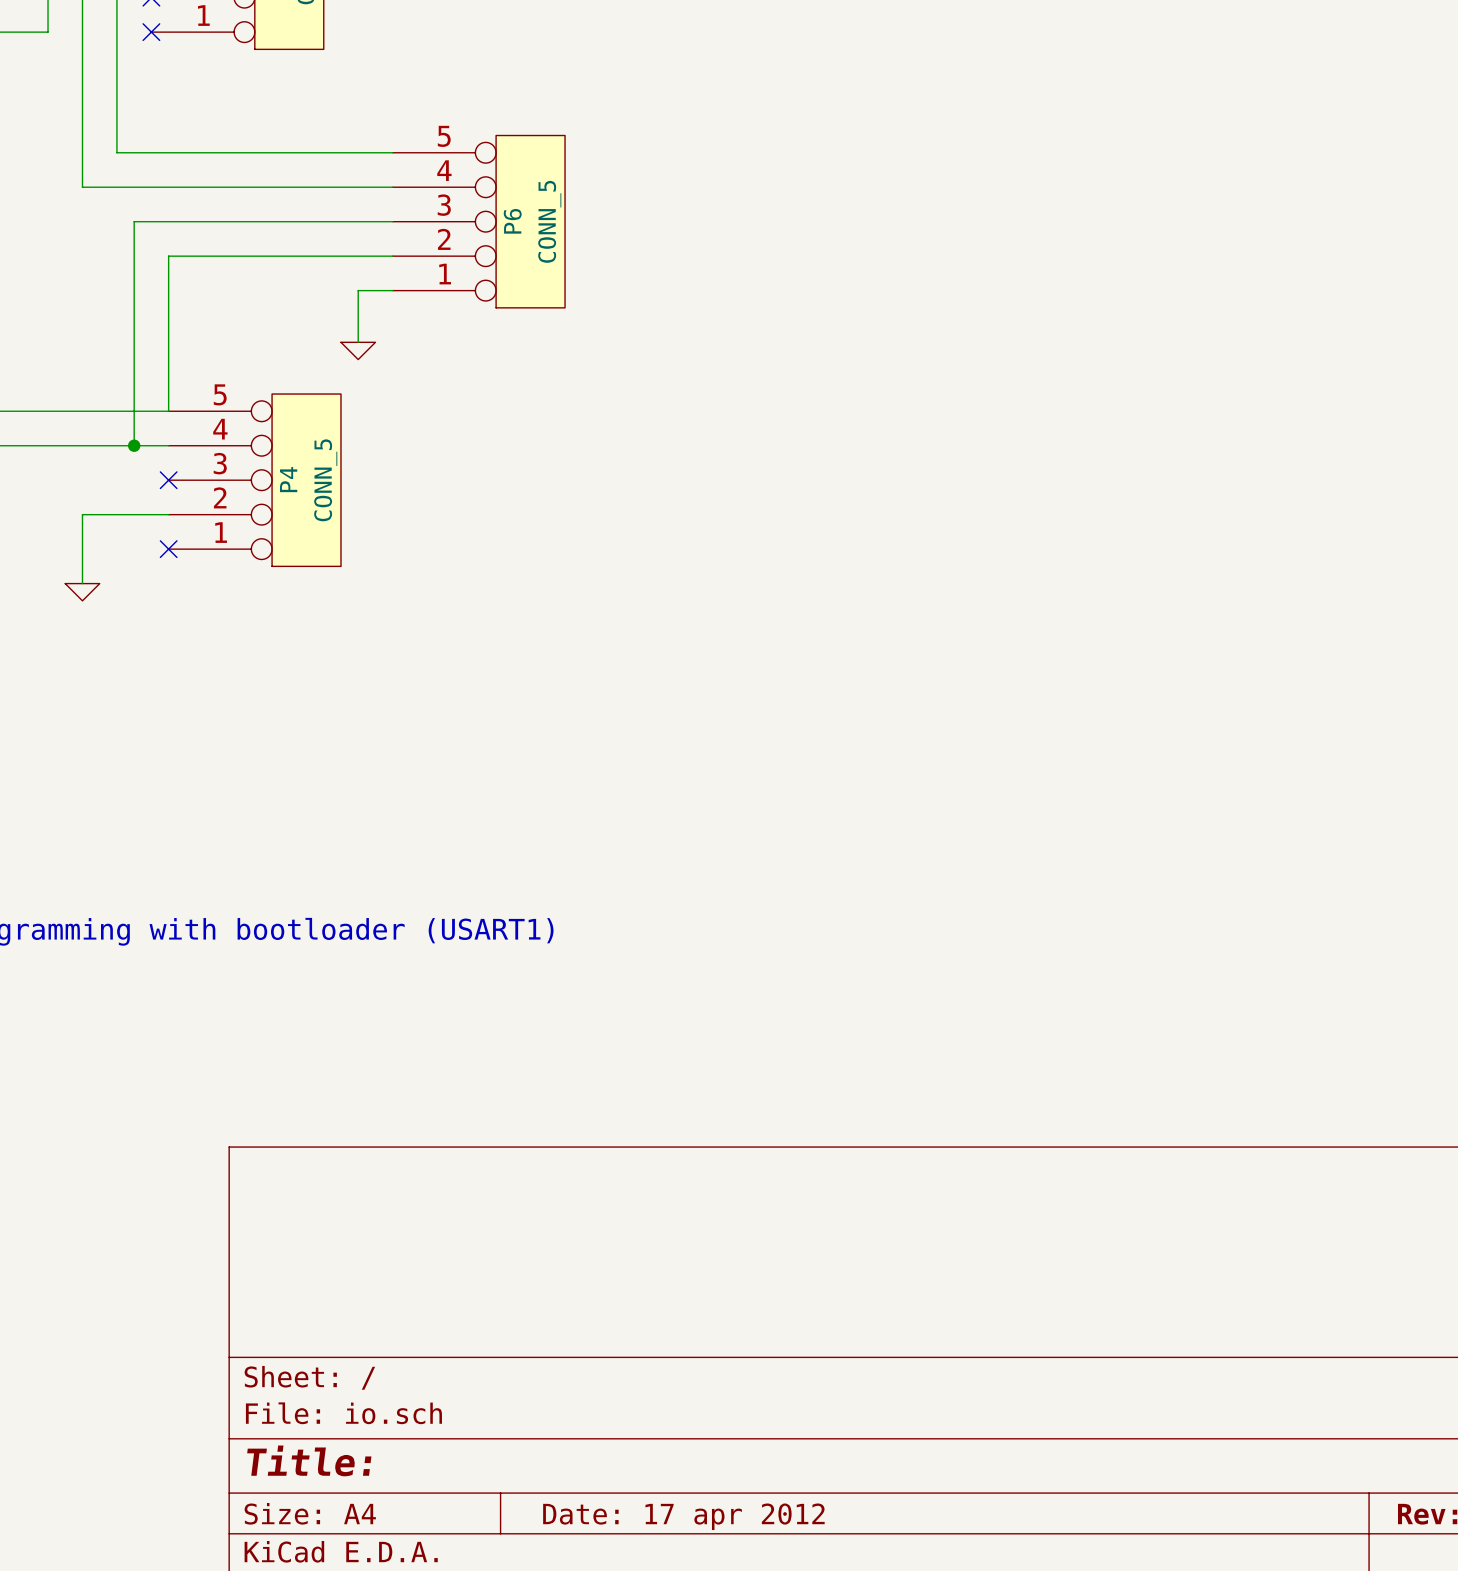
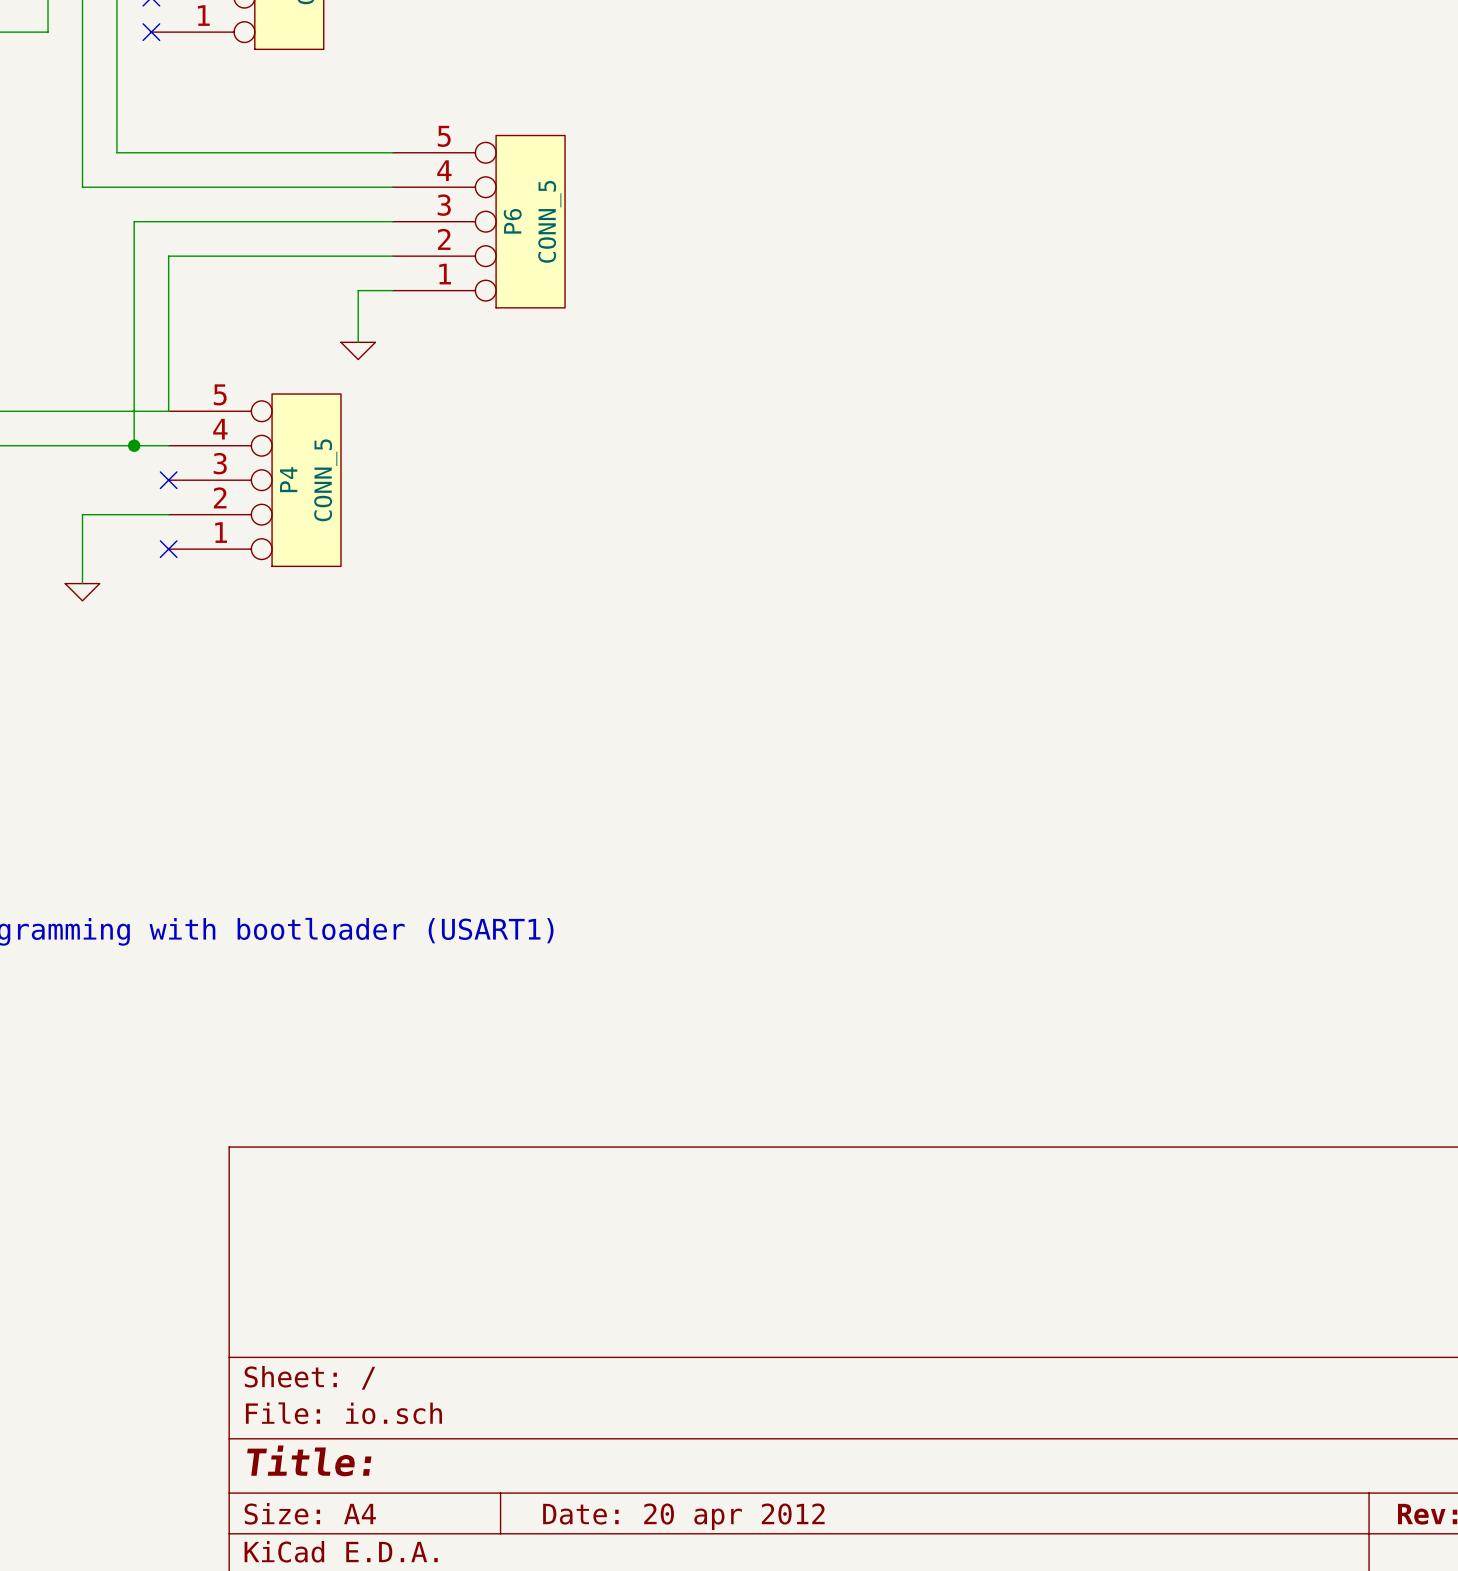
title block: Date: 17 apr 2012 (683, 1516) -> Date: 20 apr 2012 (683, 1516)

